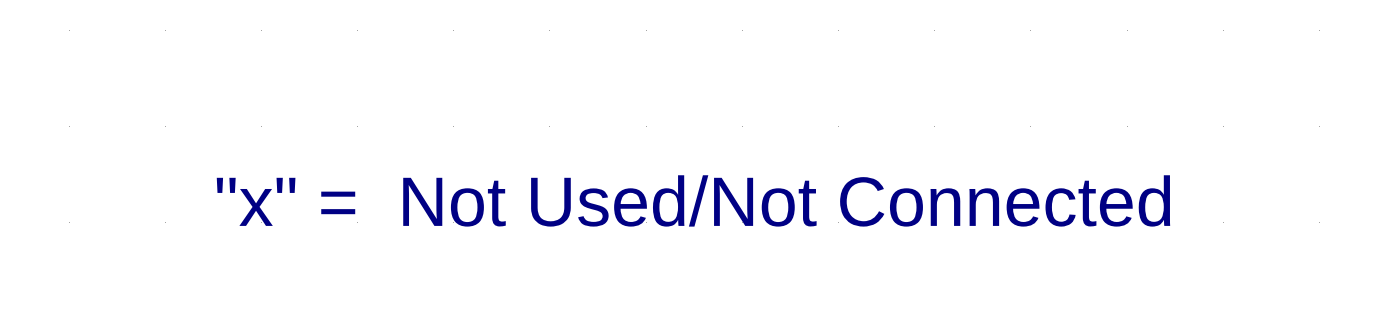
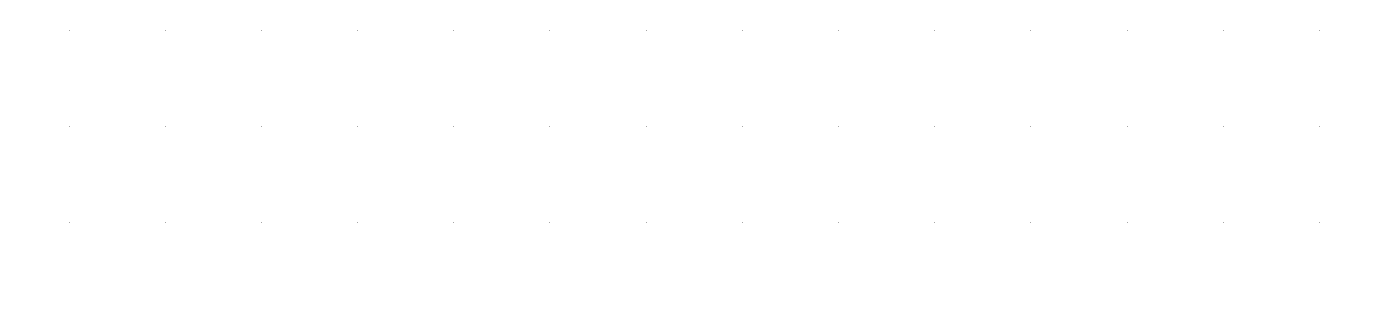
text: "x" = Not Used/Not Connected (693, 200) -> none

